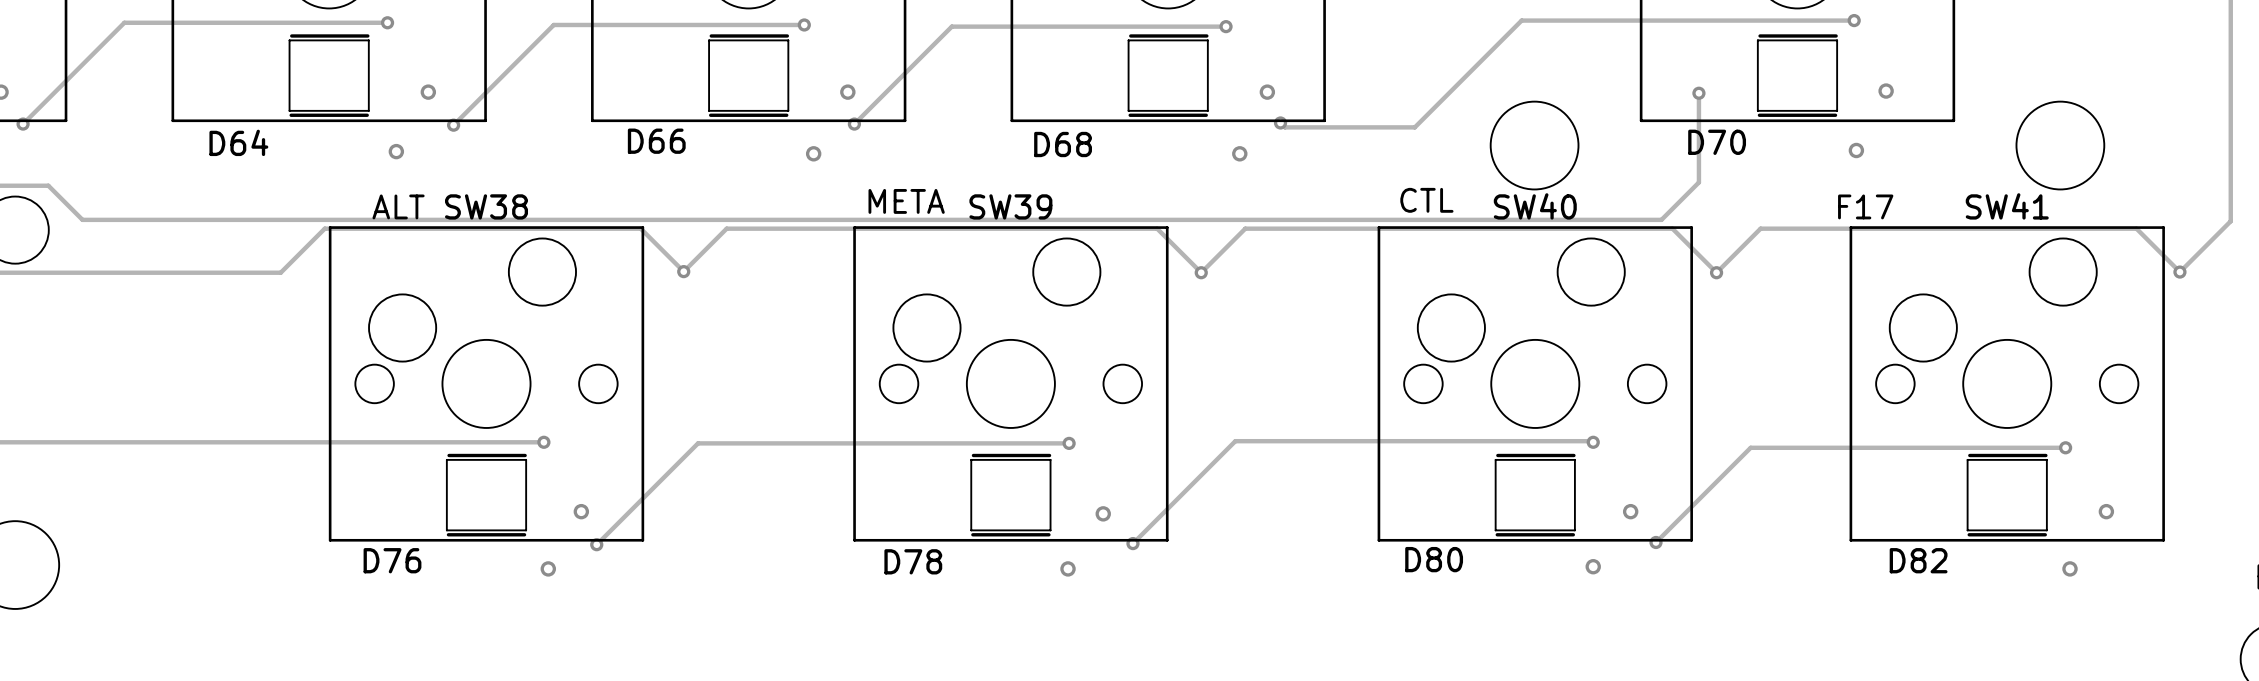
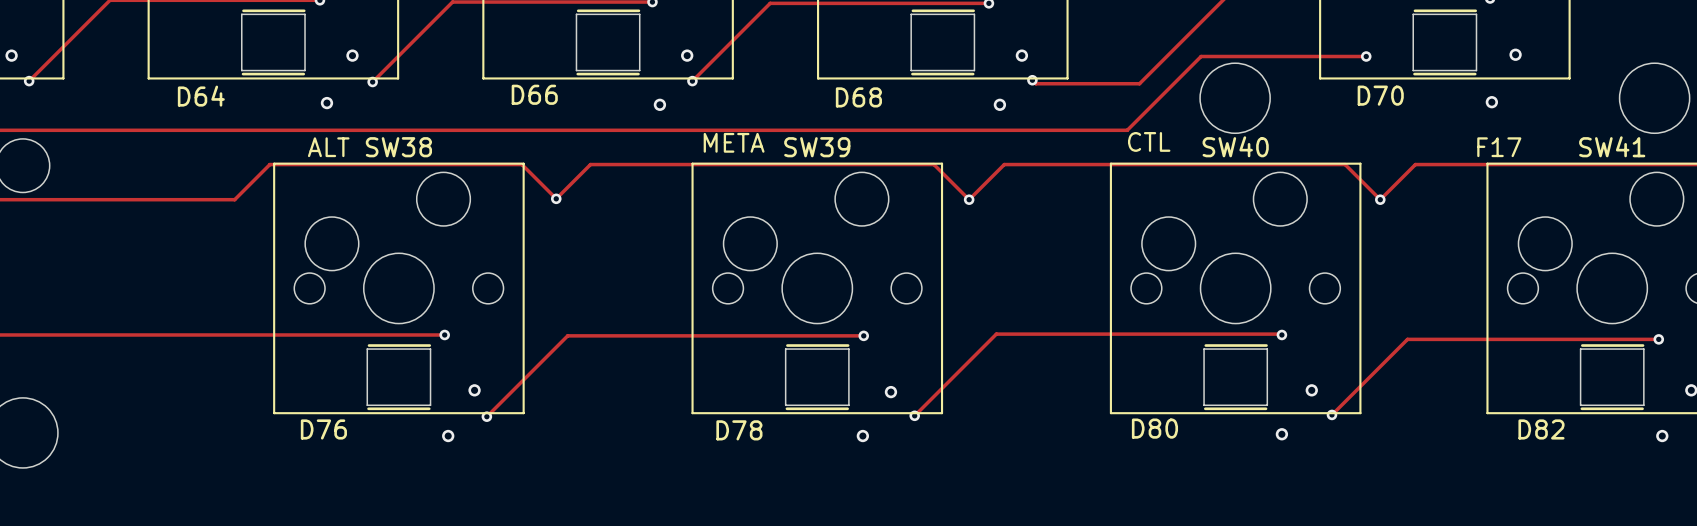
track: (1698, 93) (1698, 182) (1661, 219) (82, 219) (48, 185) -> (1366, 56) (1201, 56) (1127, 130) (49, 130)

